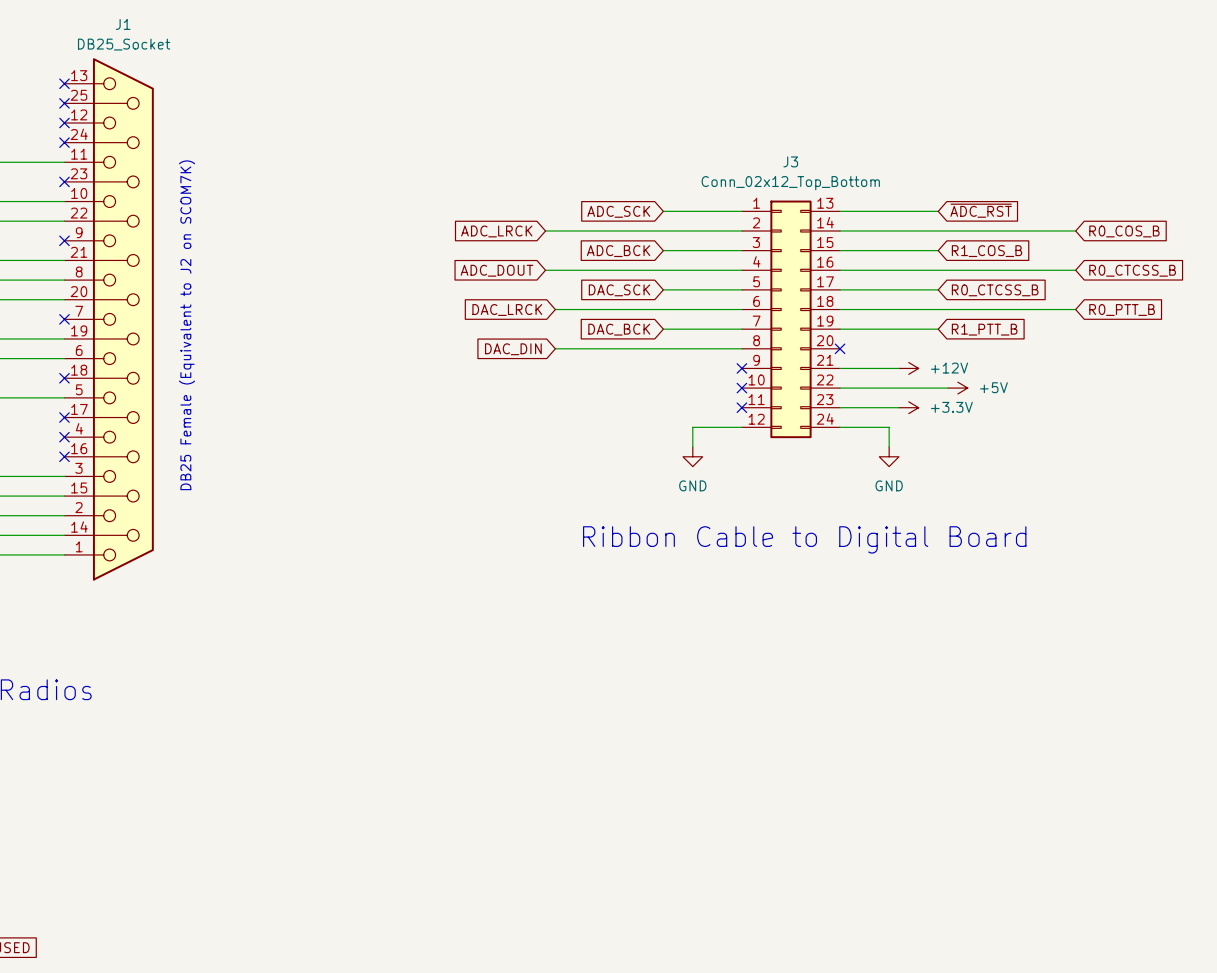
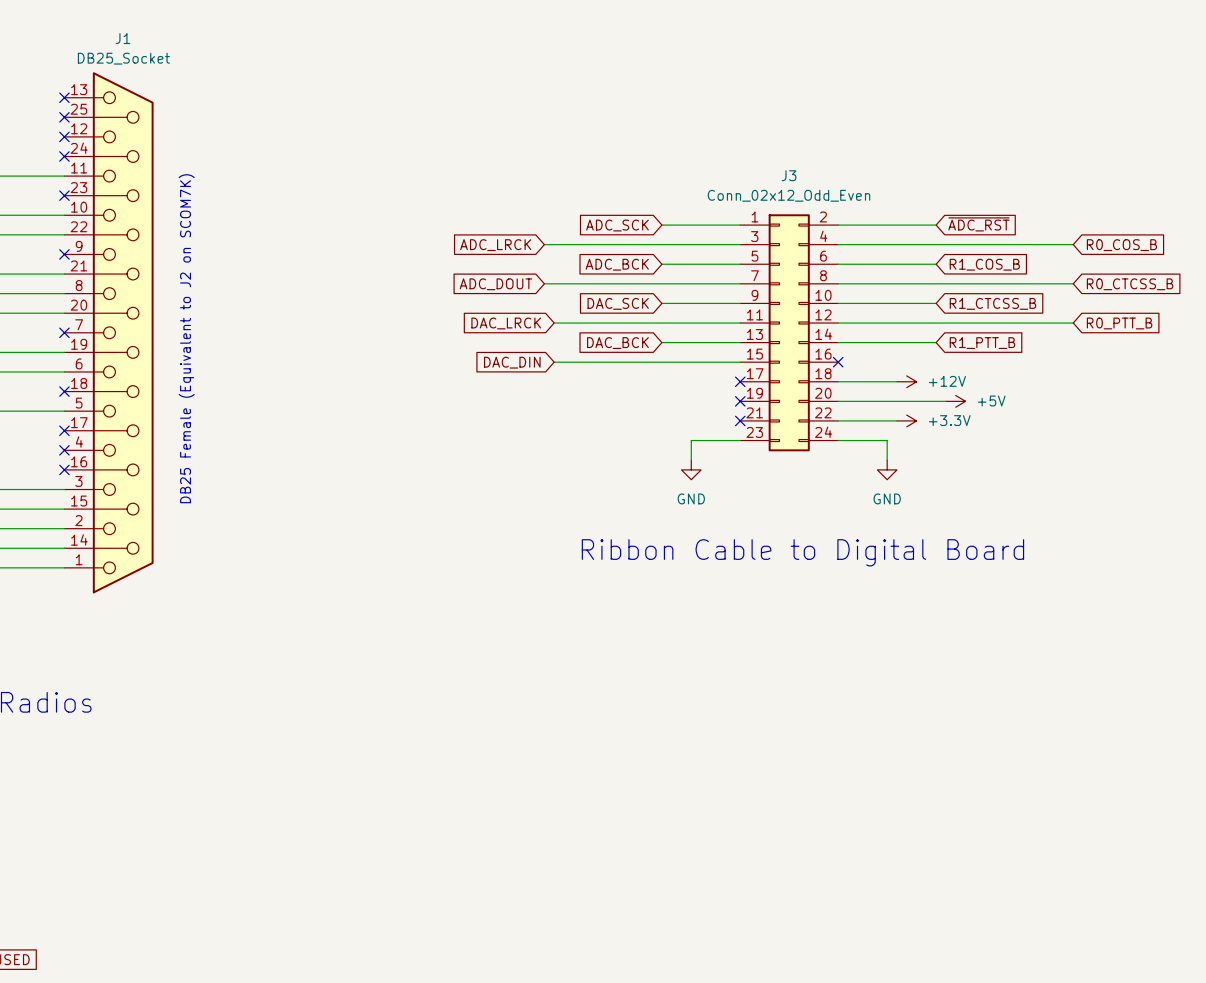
J3 value: Conn_02x12_Top_Bottom (790, 183) -> Conn_02x12_Odd_Even (789, 195)
J3 symbol: [741, 200, 841, 439] -> [740, 214, 839, 452]
global label: R0_CTCSS_B (995, 290) -> R1_CTCSS_B (992, 303)

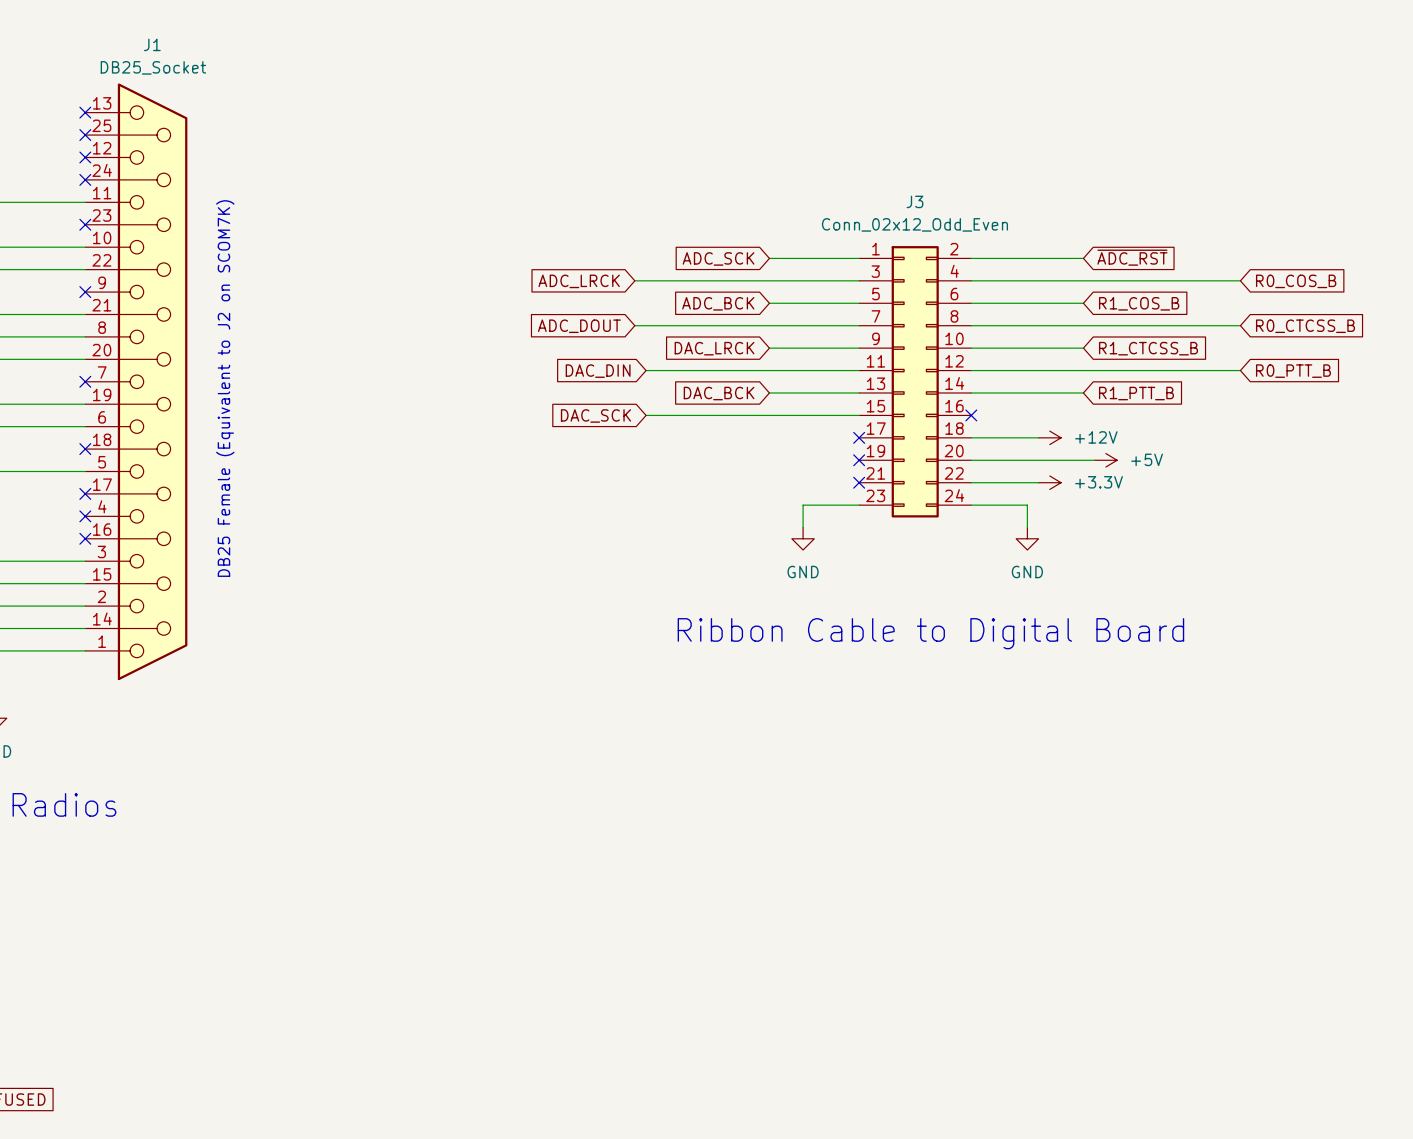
global label: DAC_SCK (618, 303) -> DAC_LRCK (714, 348)
global label: DAC_LRCK (506, 323) -> DAC_DIN (598, 371)
global label: DAC_DIN (512, 362) -> DAC_SCK (595, 415)

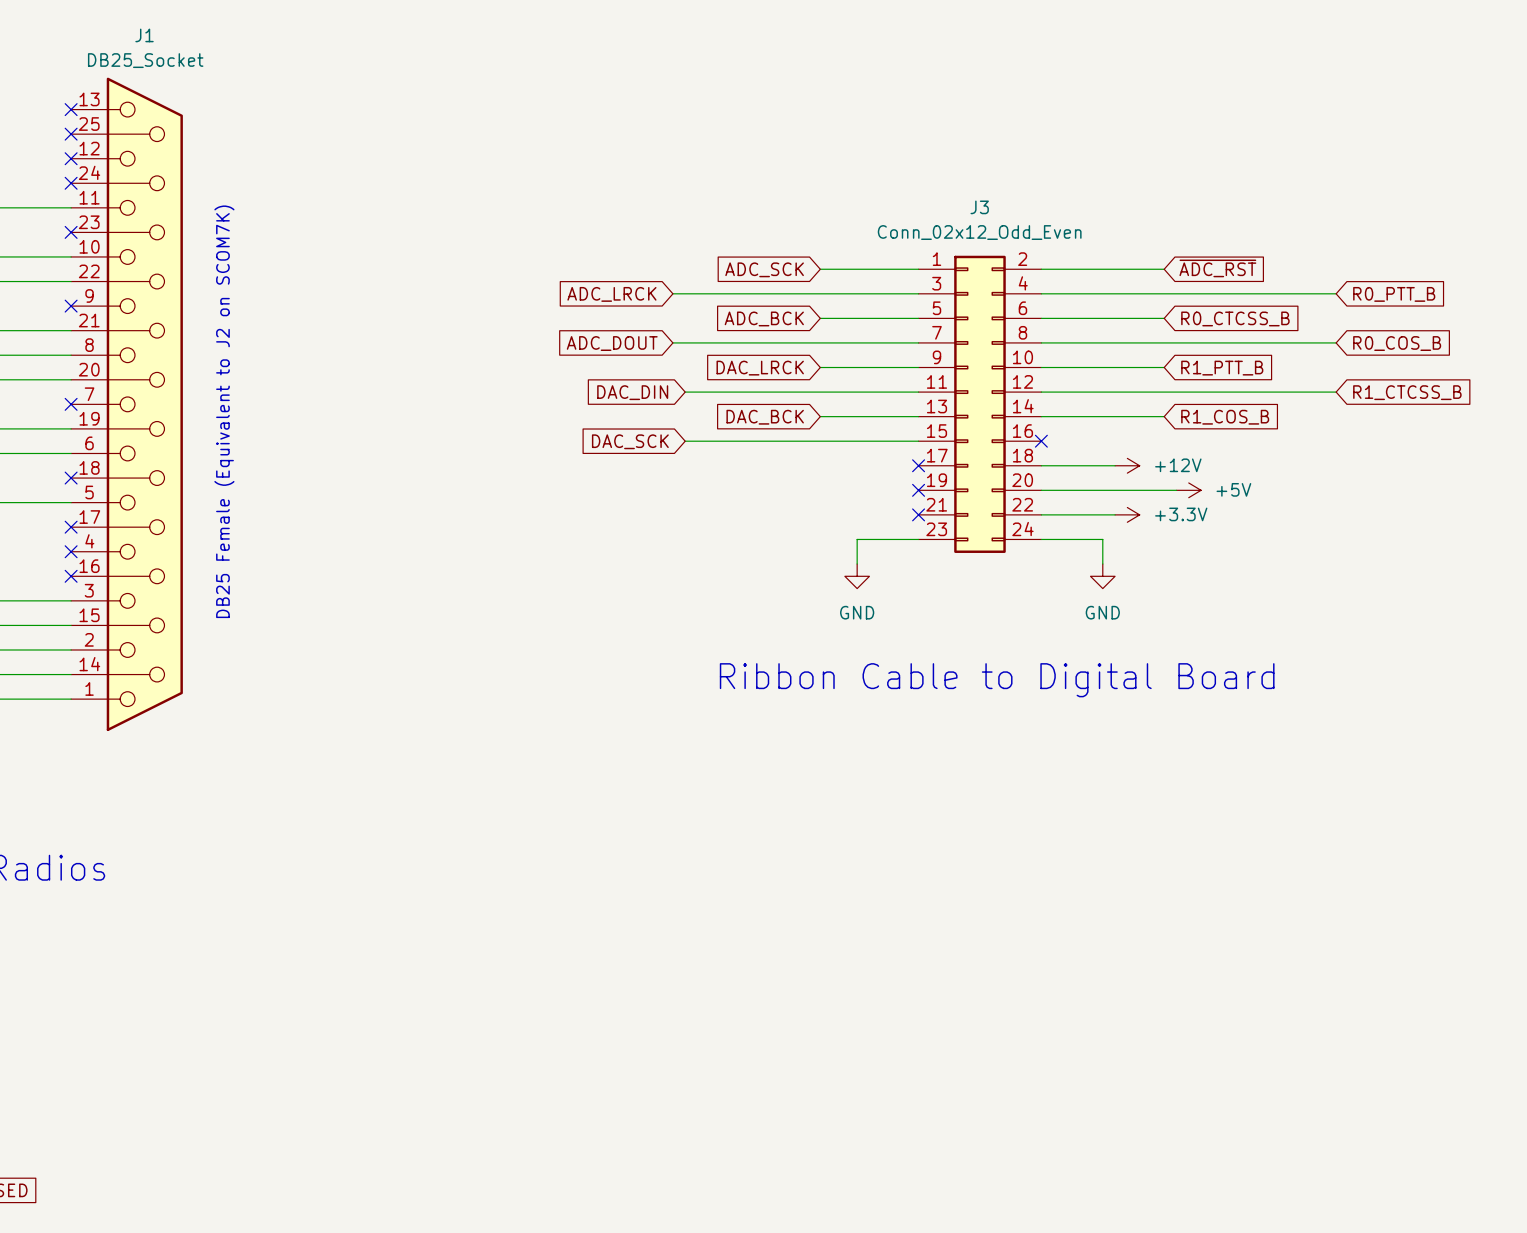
global label: R0_COS_B (1296, 281) -> R0_PTT_B (1394, 294)
global label: R1_COS_B (1139, 303) -> R0_CTCSS_B (1235, 318)
global label: R0_CTCSS_B (1305, 326) -> R0_COS_B (1397, 343)
global label: R1_CTCSS_B (1148, 348) -> R1_PTT_B (1222, 368)
global label: R0_PTT_B (1293, 371) -> R1_CTCSS_B (1407, 392)
global label: R1_PTT_B (1136, 393) -> R1_COS_B (1225, 417)

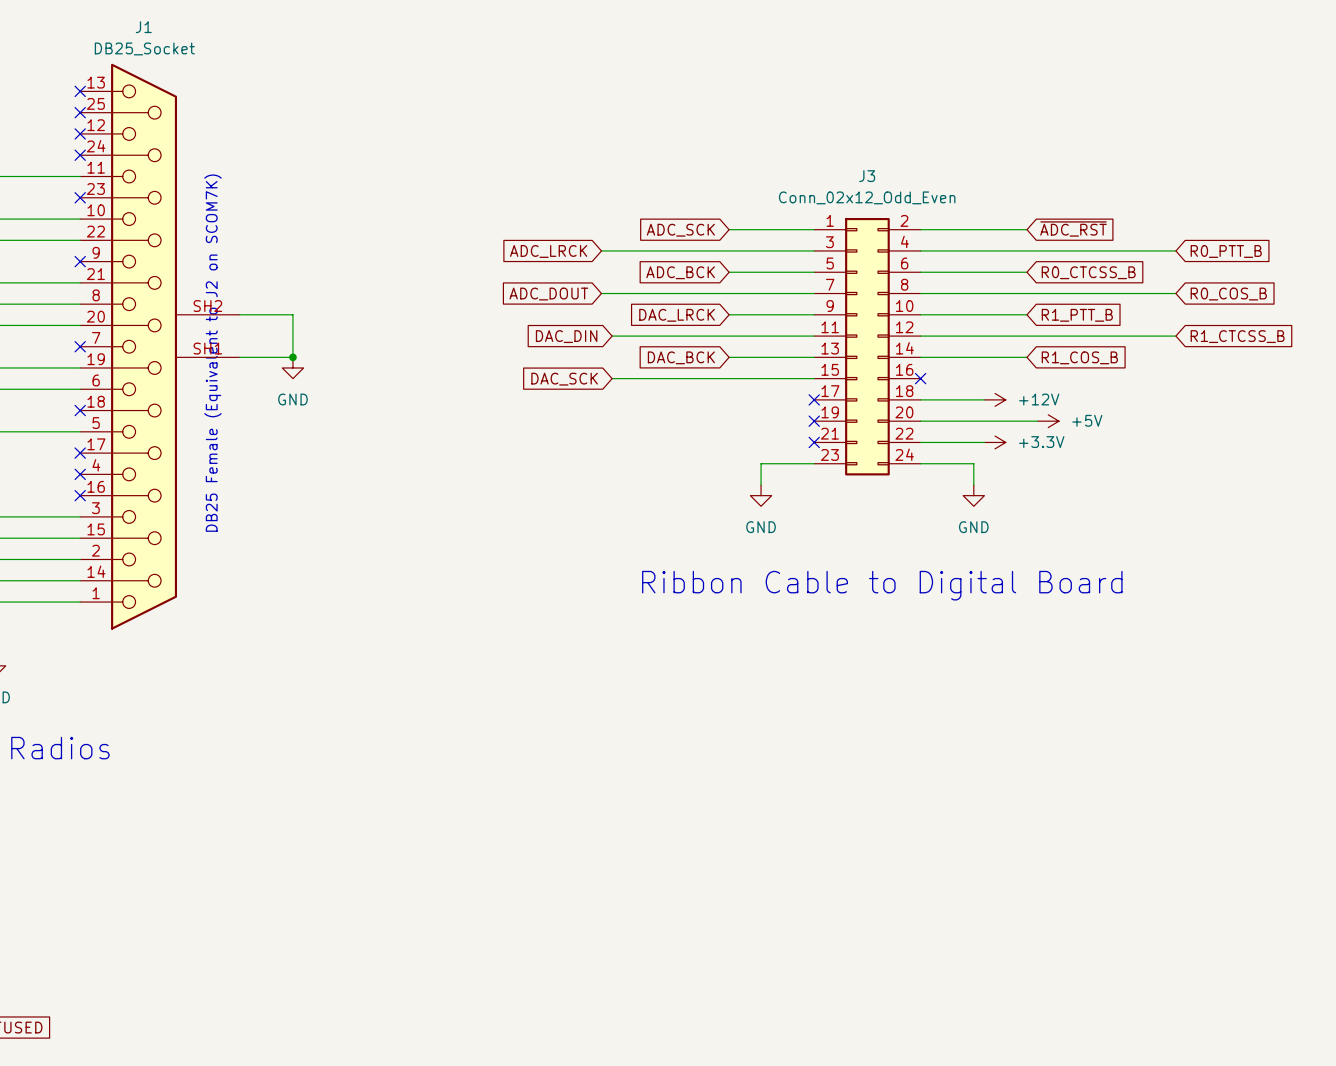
J1 symbol: [71, 77, 183, 732] -> [80, 63, 240, 630]
wire: none -> (239, 314) (292, 314) (292, 357) (239, 357)
junction: none -> (292, 357)
power symbol: none -> GND (292, 367)

